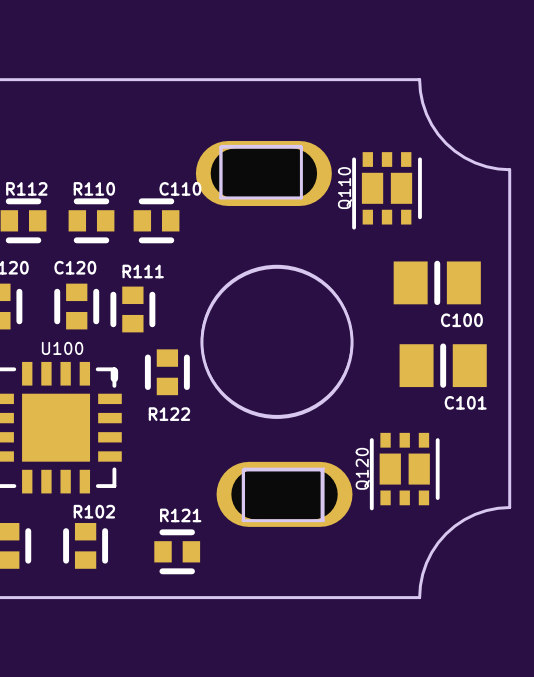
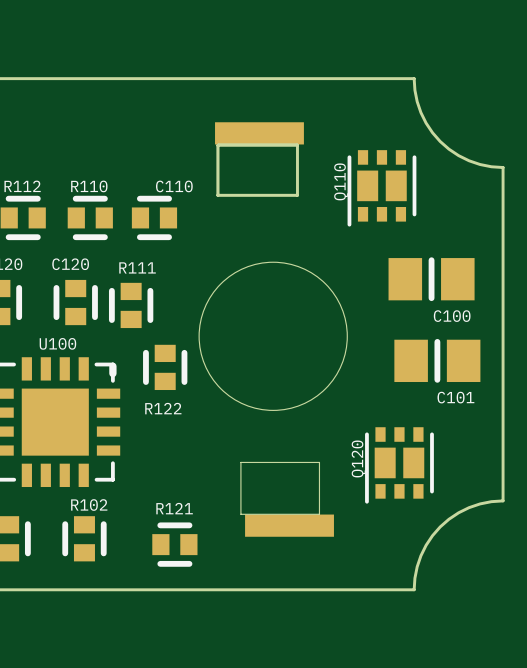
part: none -> (259, 133)
part: (263, 173) -> none
round board edge: [200, 265, 354, 419] -> none
board edge: (243, 469) (322, 469) (322, 520) (243, 520) (243, 469) -> none
part: (284, 494) -> none
part: none -> (289, 525)

